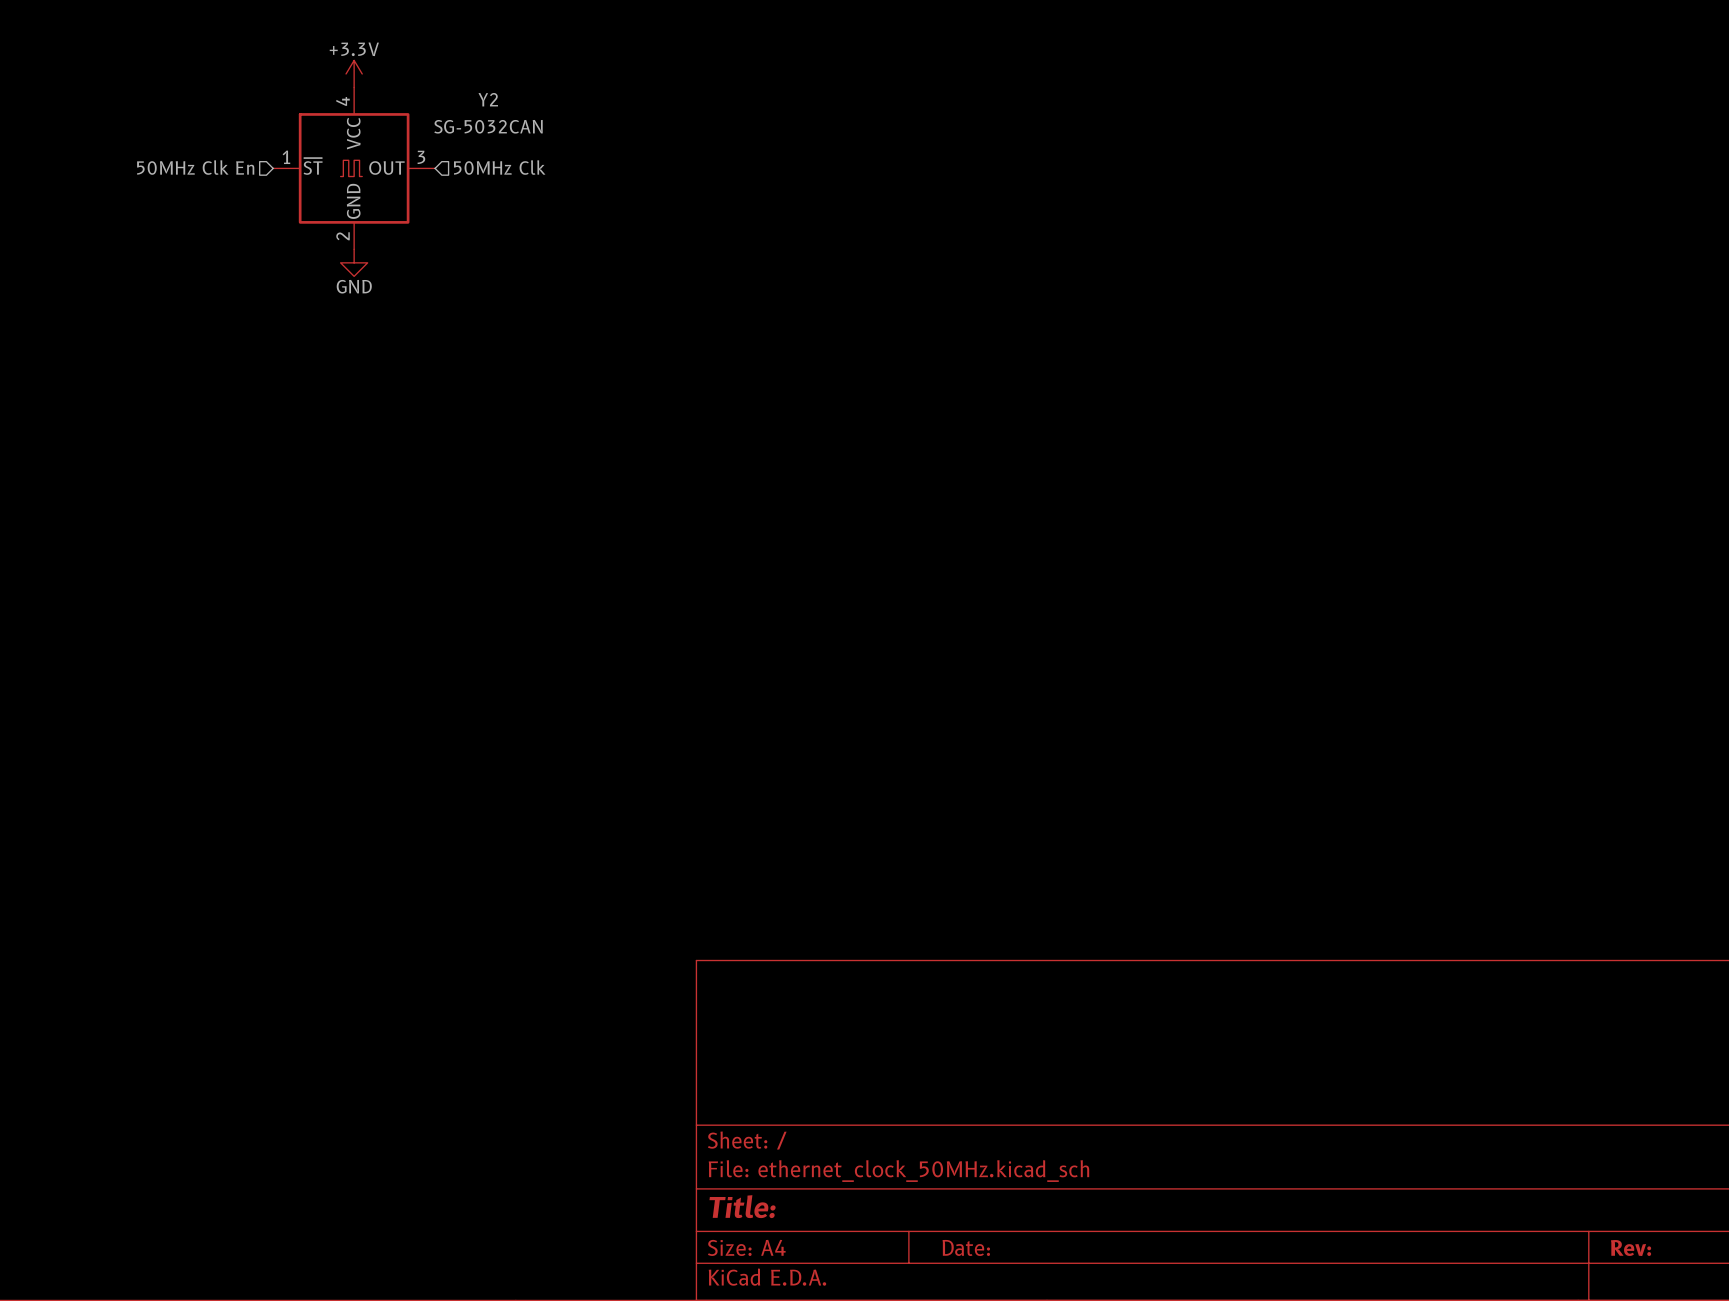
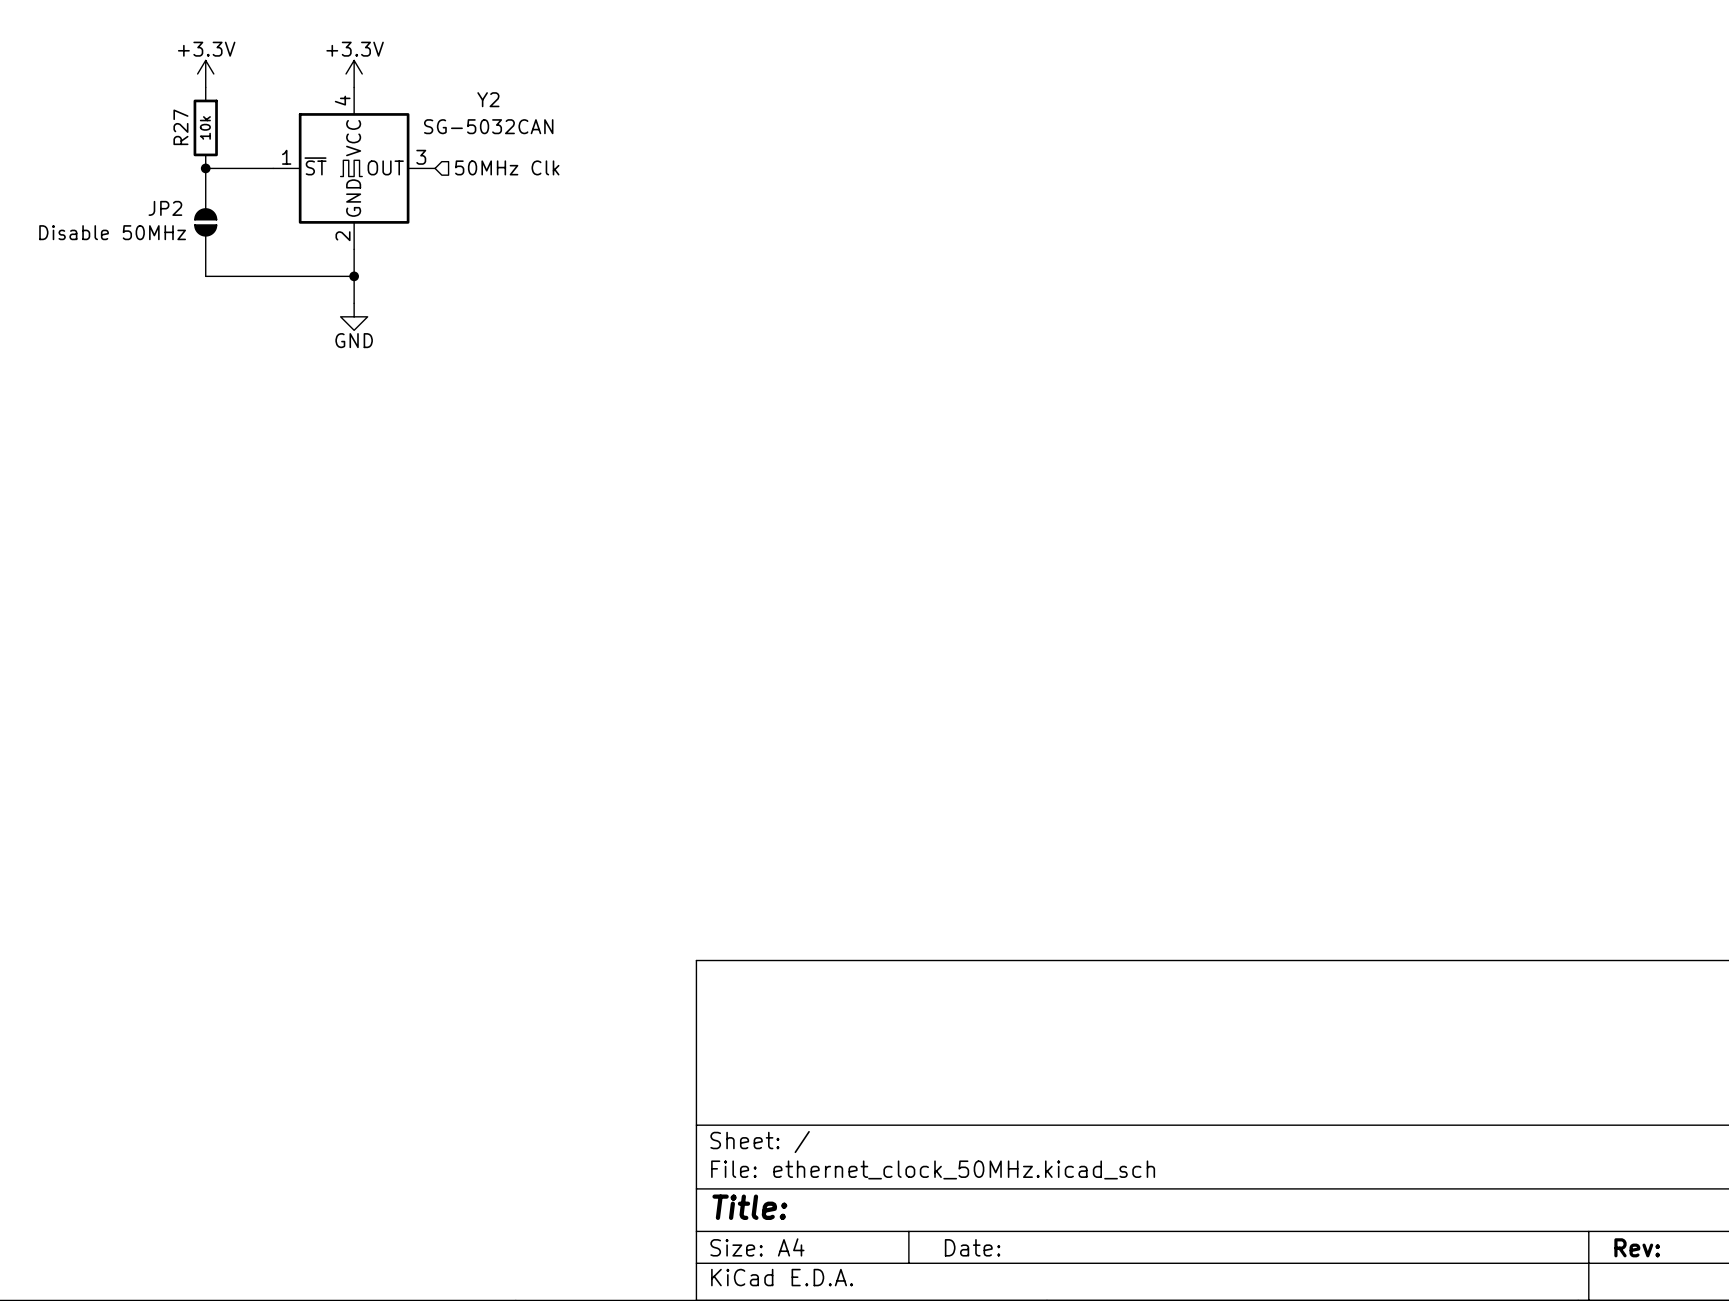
power symbol: none -> +3.3V (205, 73)
R27: none -> 10k (205, 127)
hierarchical label: 50MHz Clk En (195, 167) -> none
wire: none -> (205, 168) (273, 168)
junction: none -> (205, 168)
JP2: none -> Disable 50MHz (205, 222)
wire: none -> (354, 249) (354, 303)
power symbol position: GND (354, 262) -> GND (354, 316)
wire: none -> (205, 276) (354, 276)
junction: none -> (354, 276)

